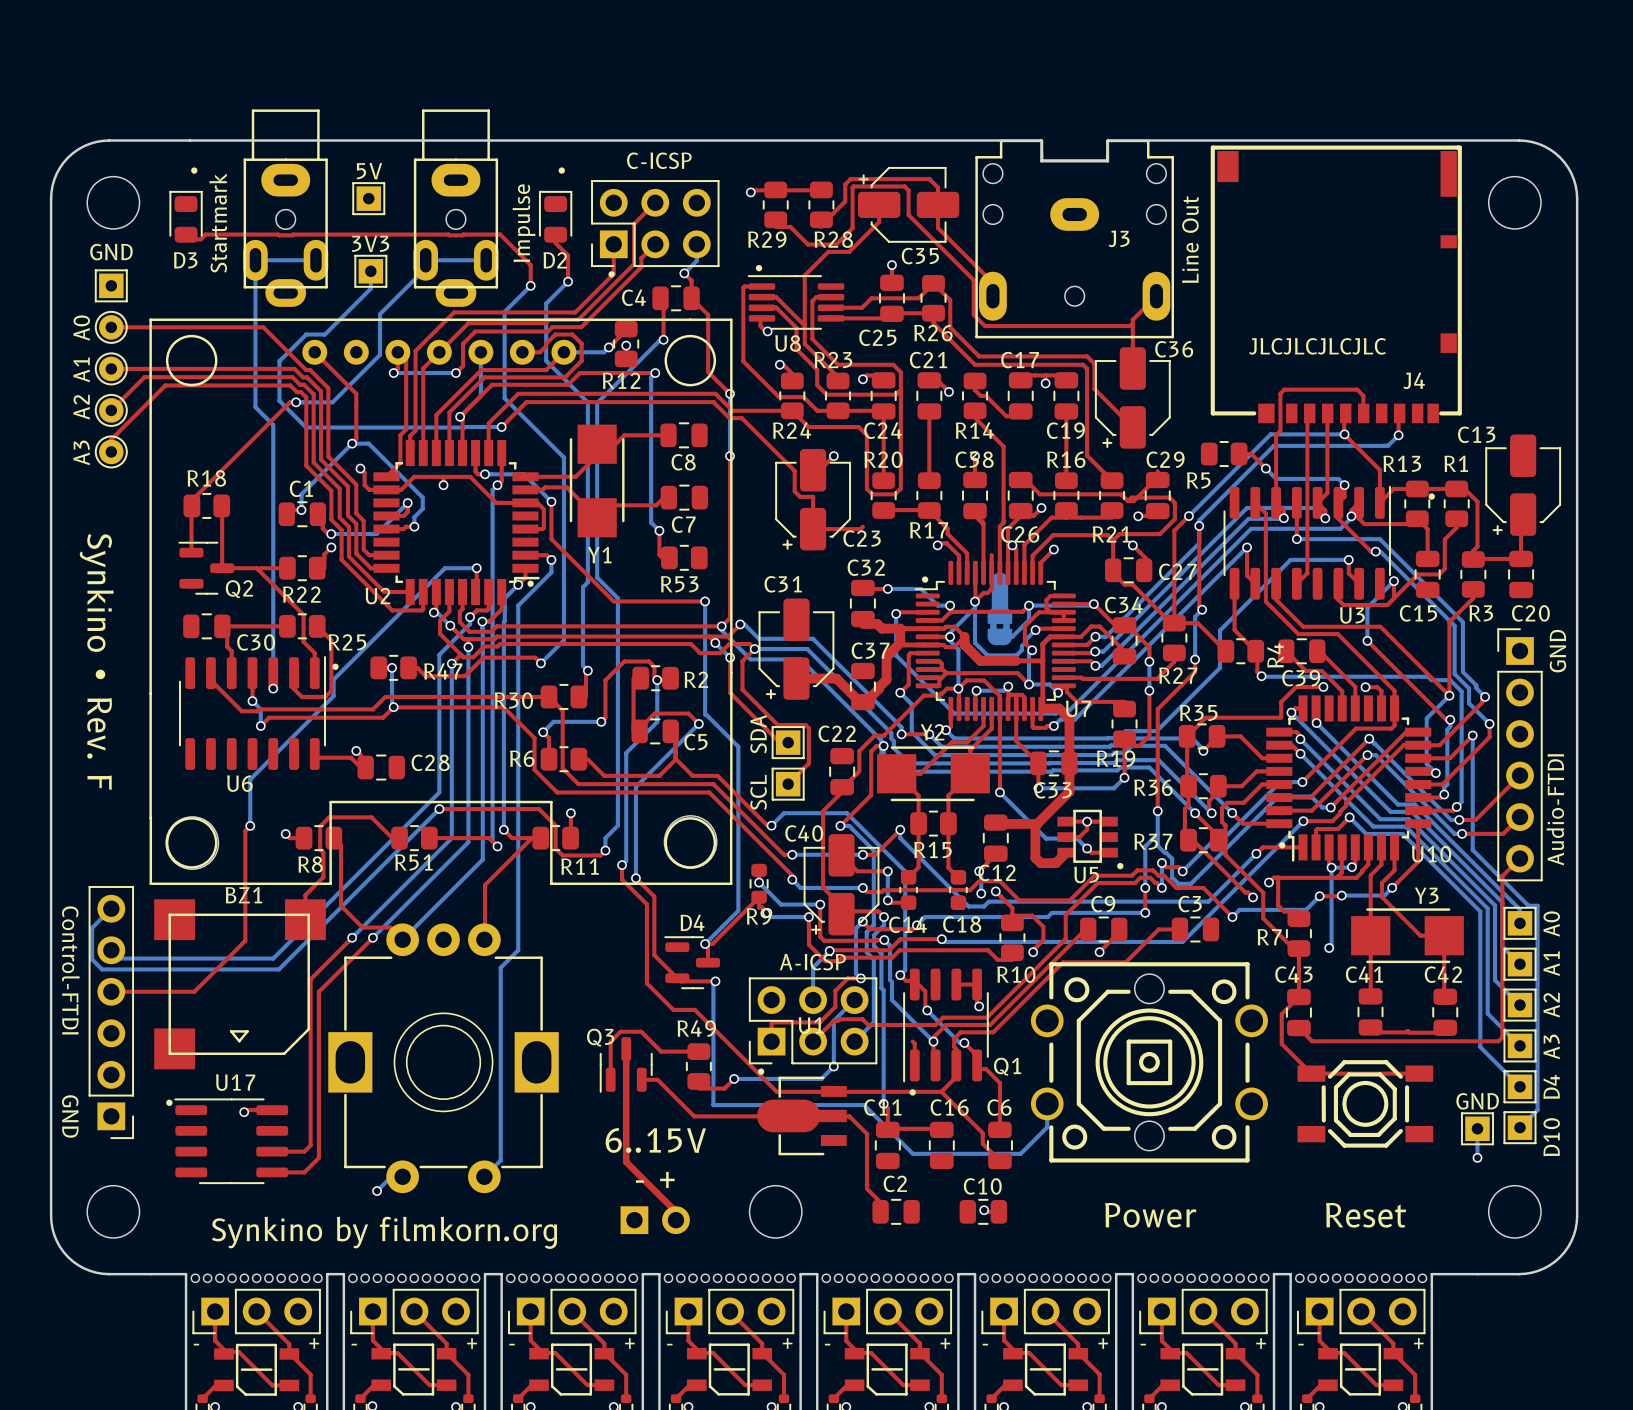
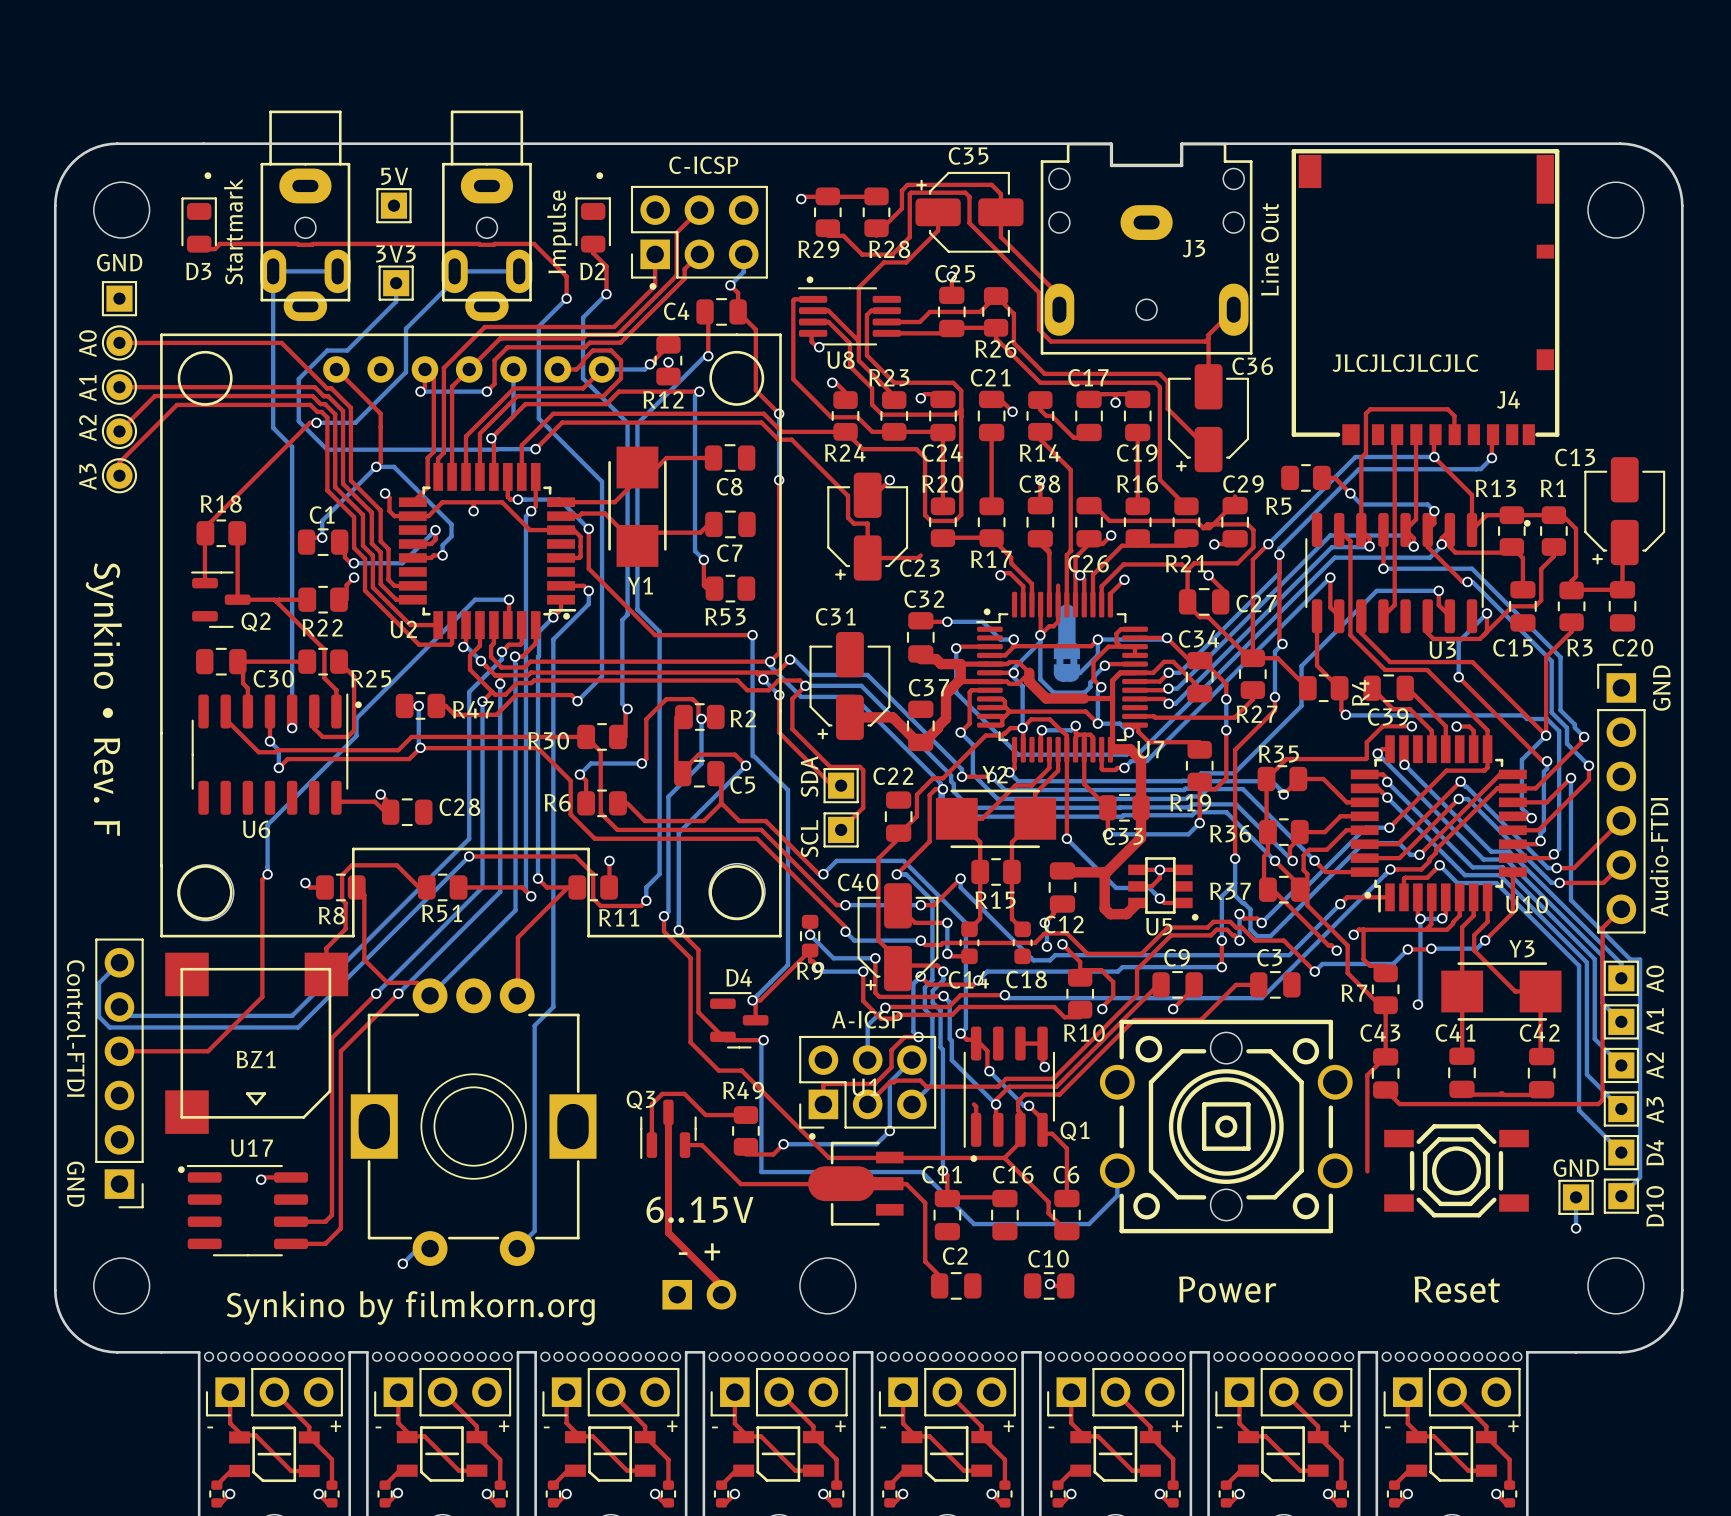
C35 name position: C35 (920, 256) -> C35 (968, 155)
C25 name position: C25 (877, 337) -> C25 (955, 273)
BZ1 name position: BZ1 (243, 895) -> BZ1 (256, 1059)
top track: (1281, 1043) (1311, 1073) (1419, 1073) -> (1367, 1106) (1367, 1171)

